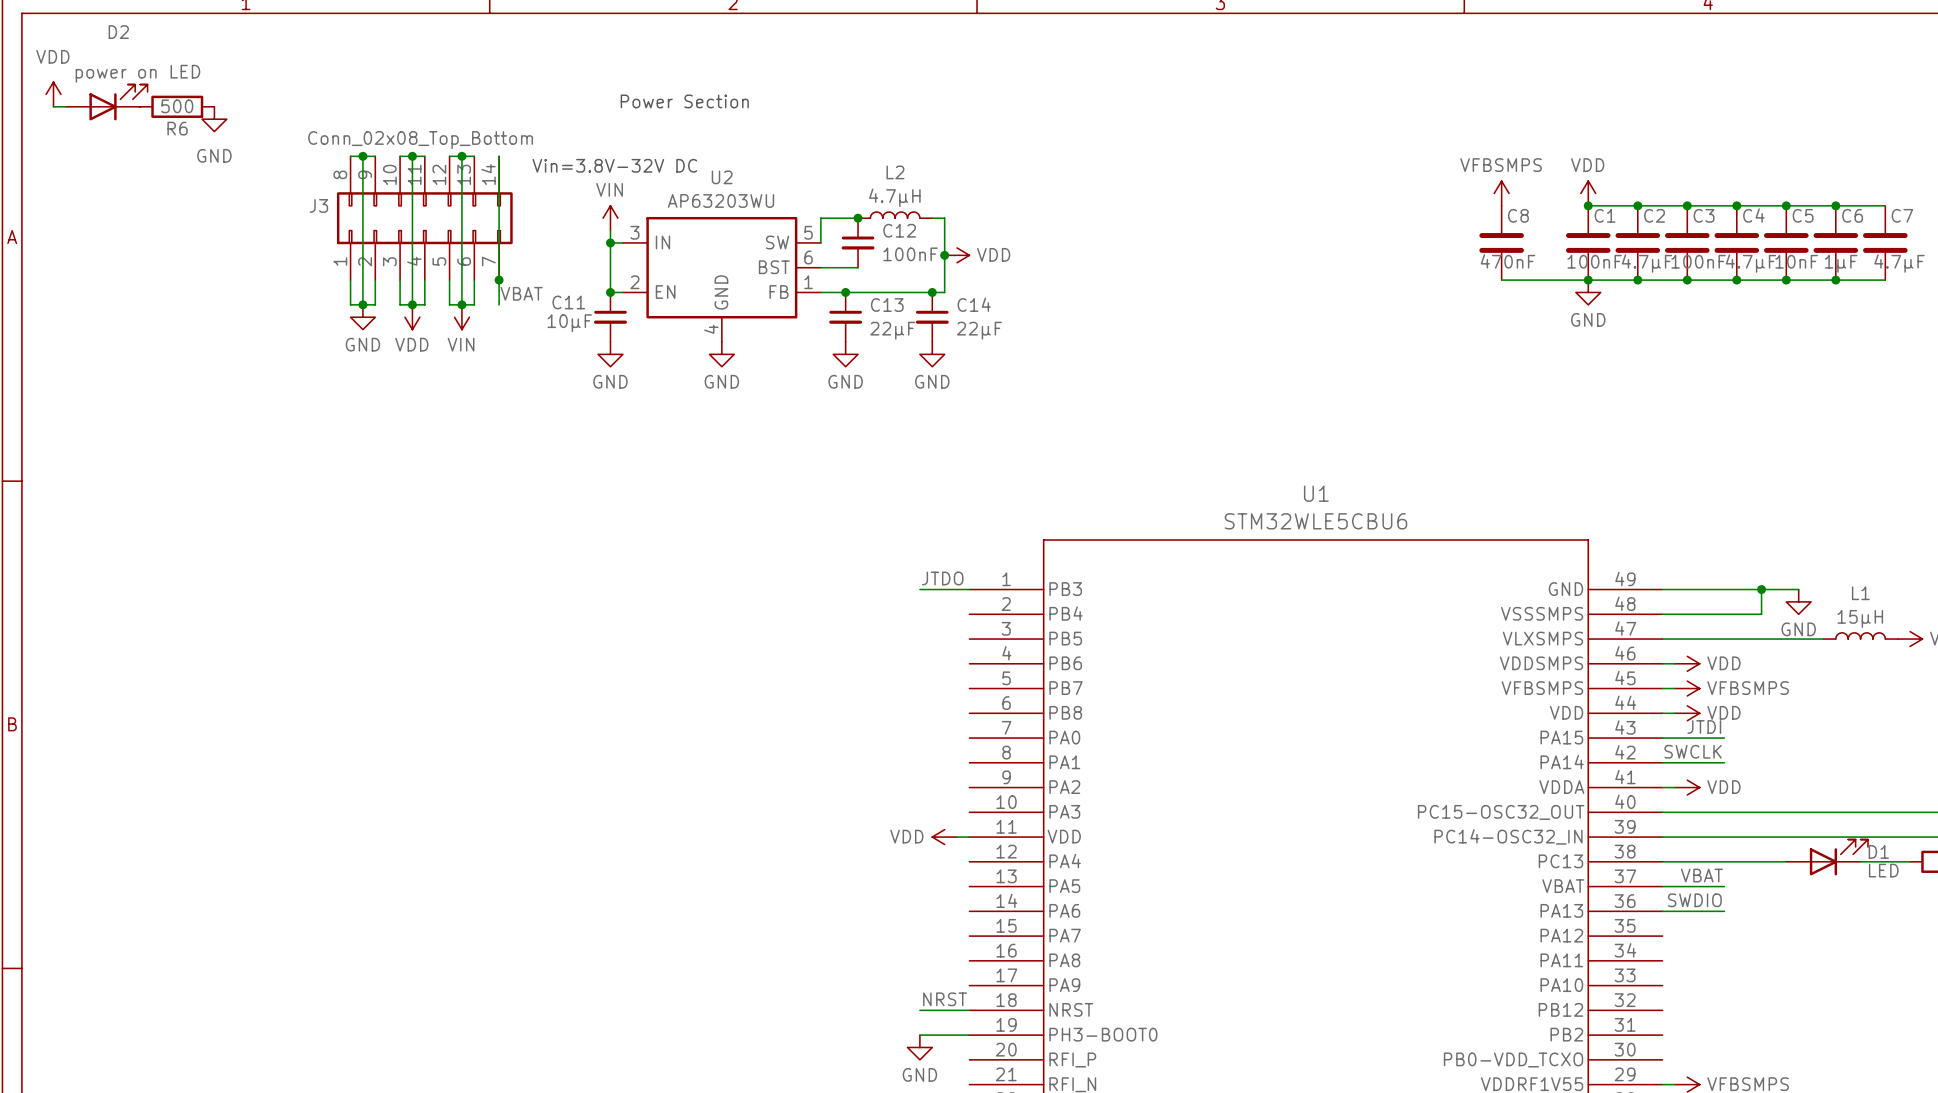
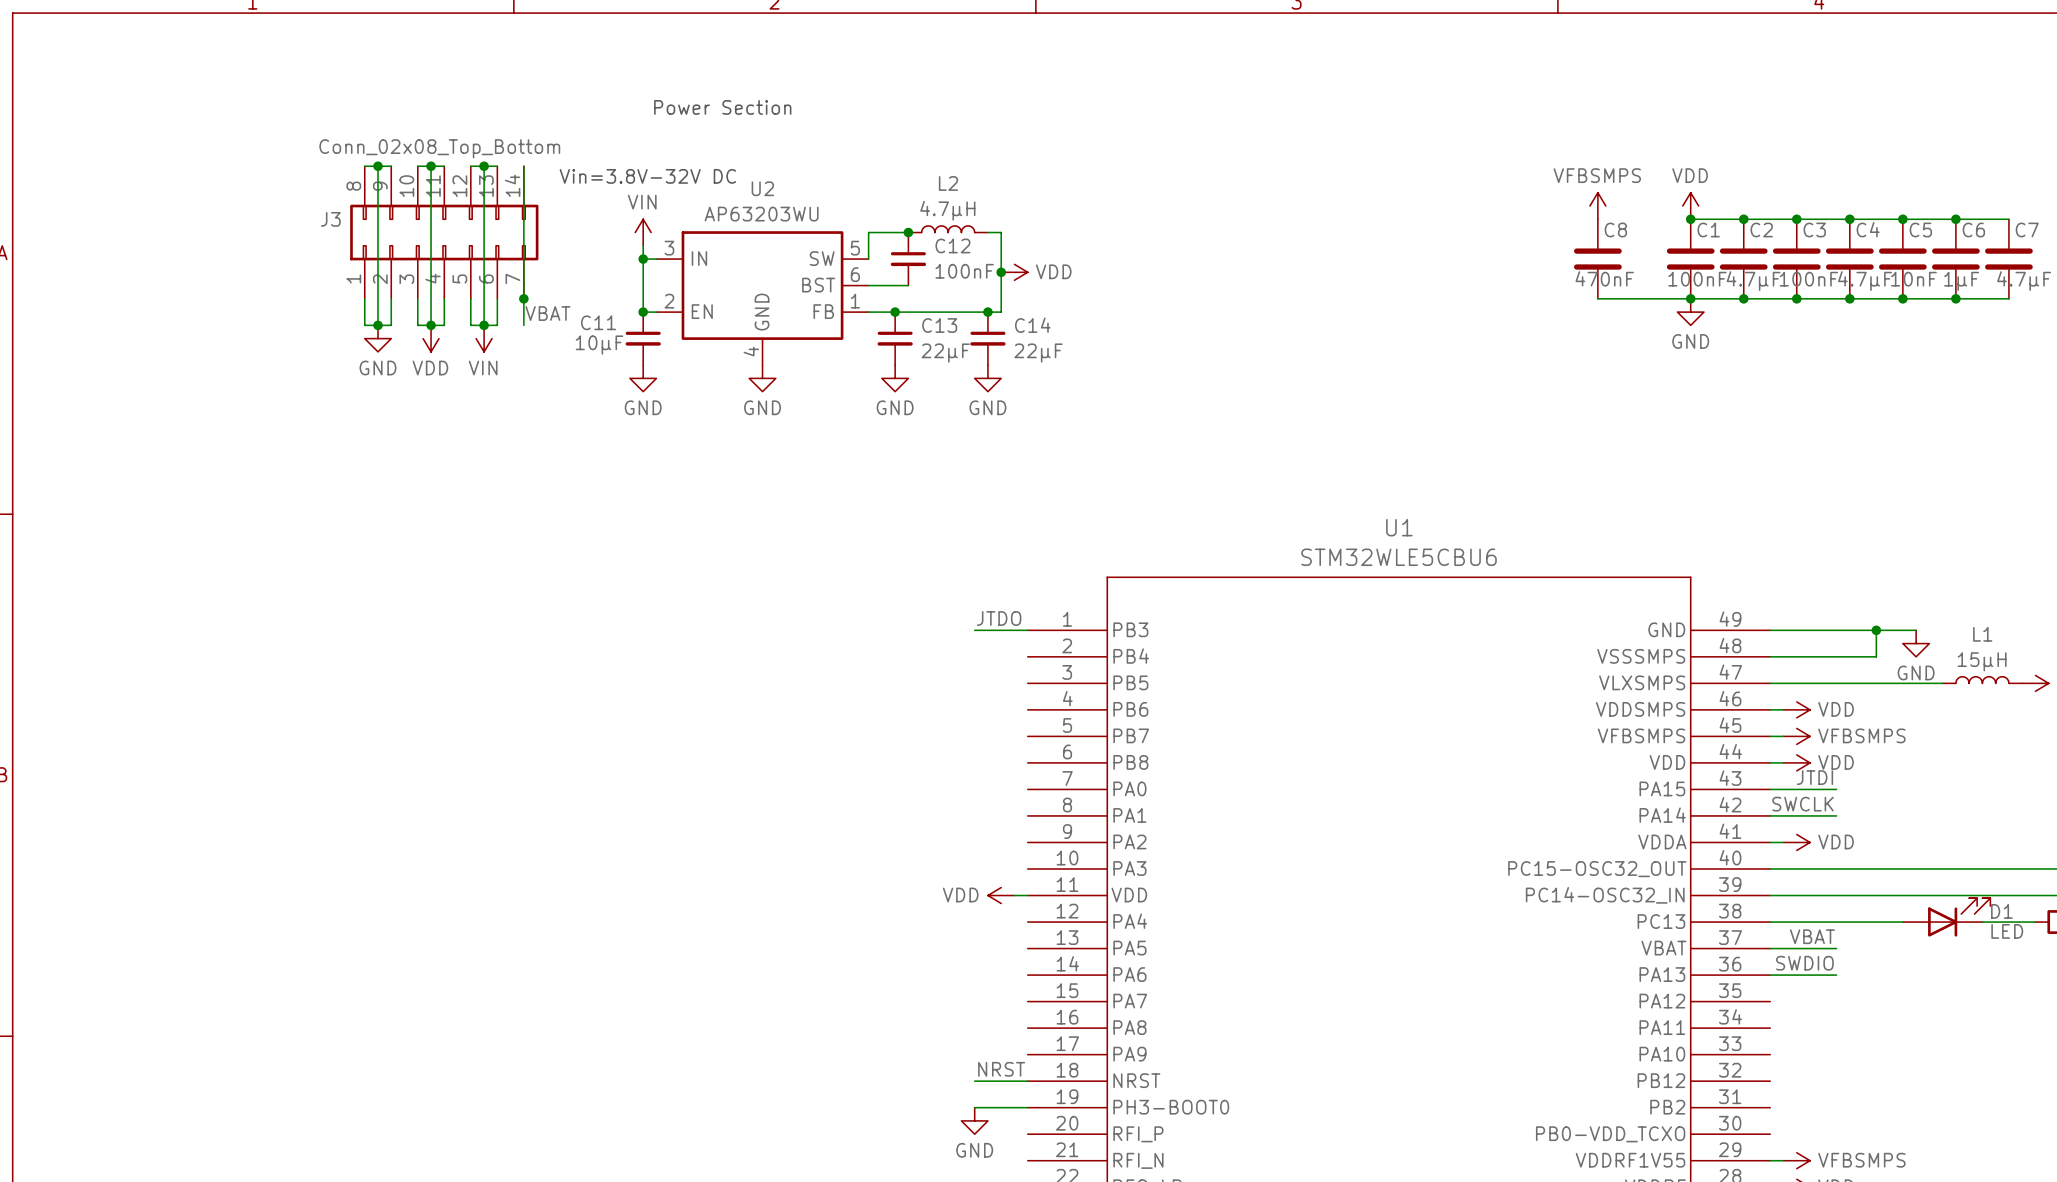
power symbol: VDD (53, 94) -> none
D2: power on LED (106, 102) -> none
wire: (53, 106) (65, 106) -> none
R6: 500 (177, 106) -> none
power symbol: GND (214, 119) -> none

